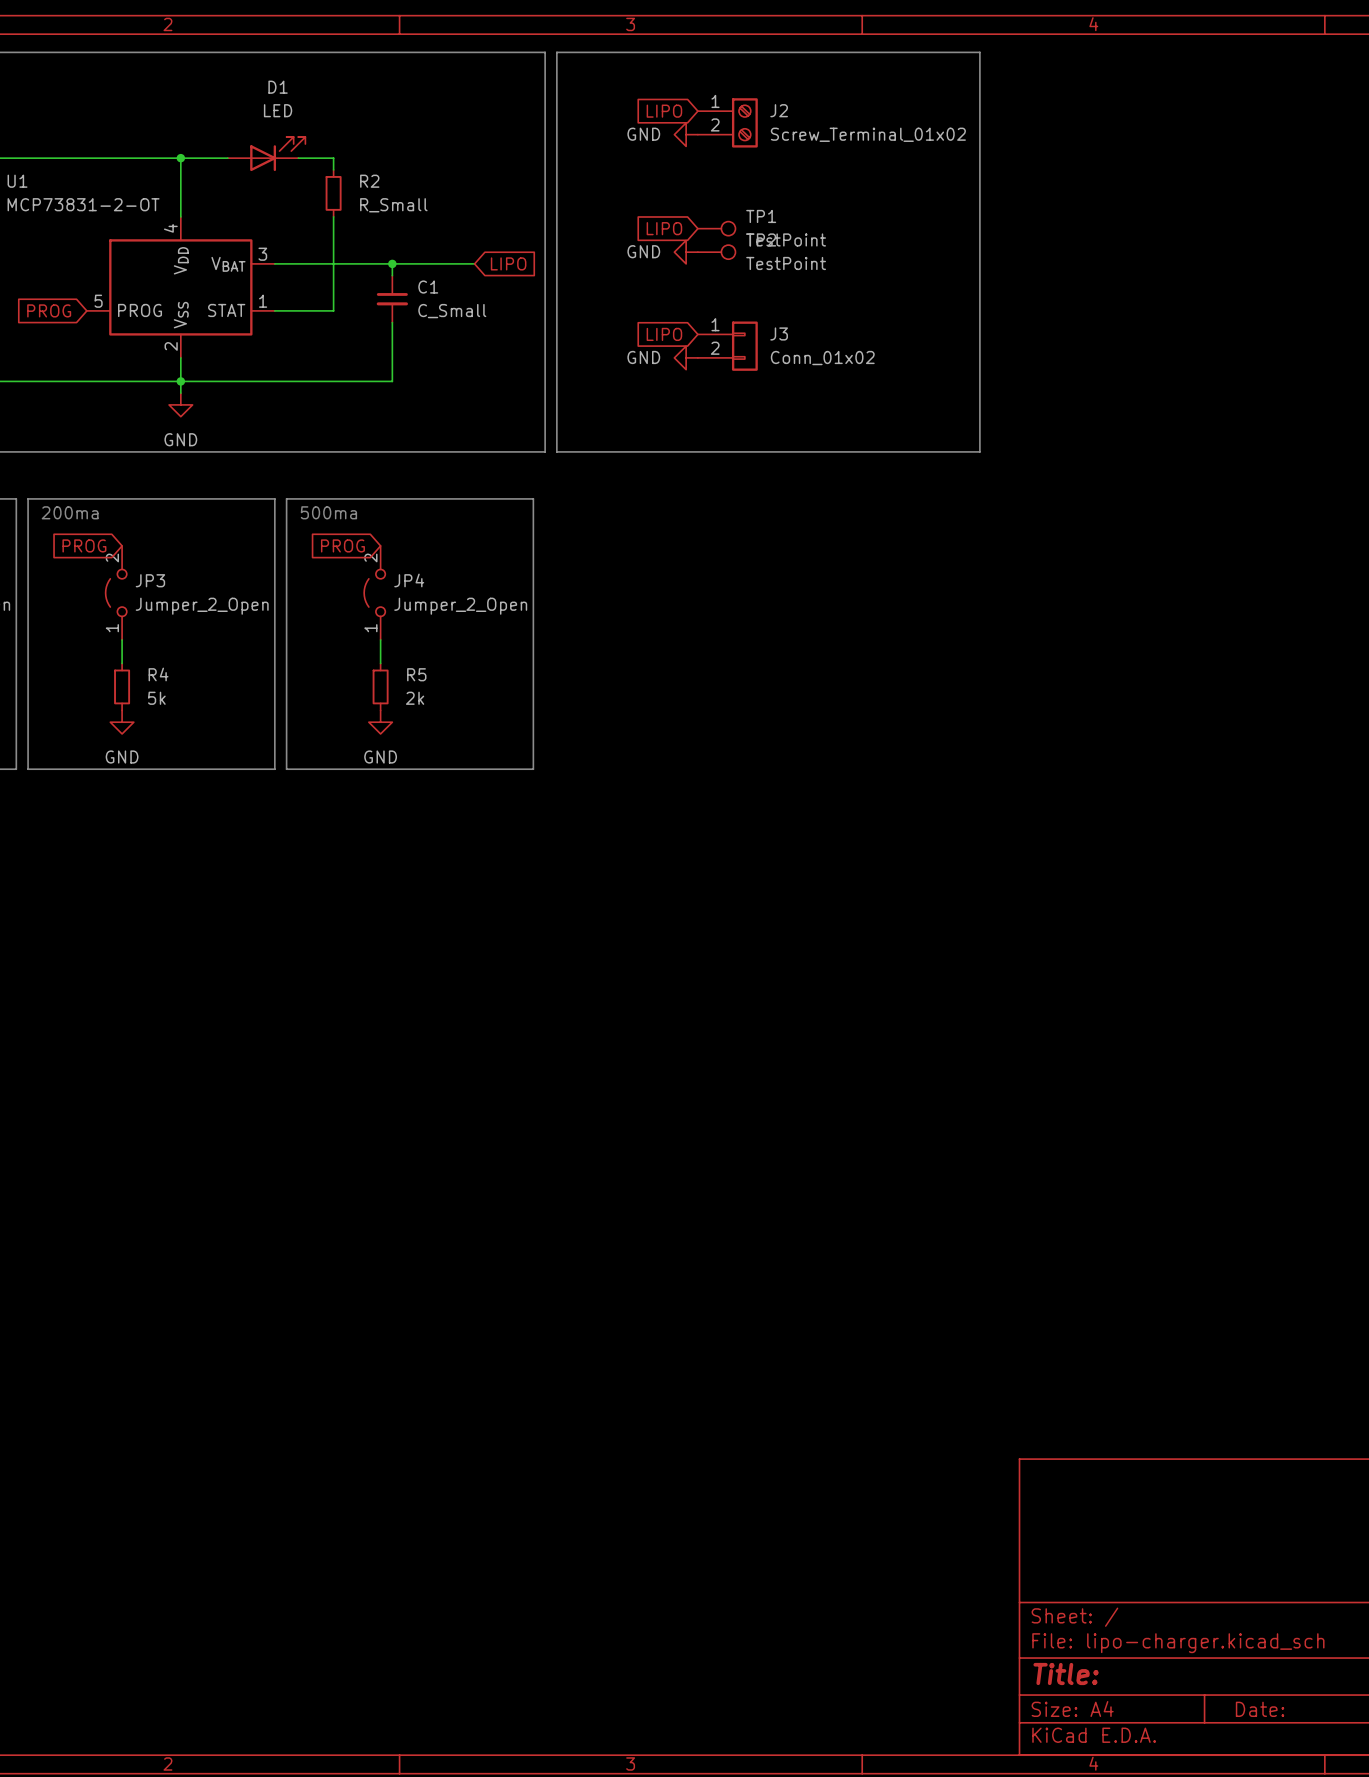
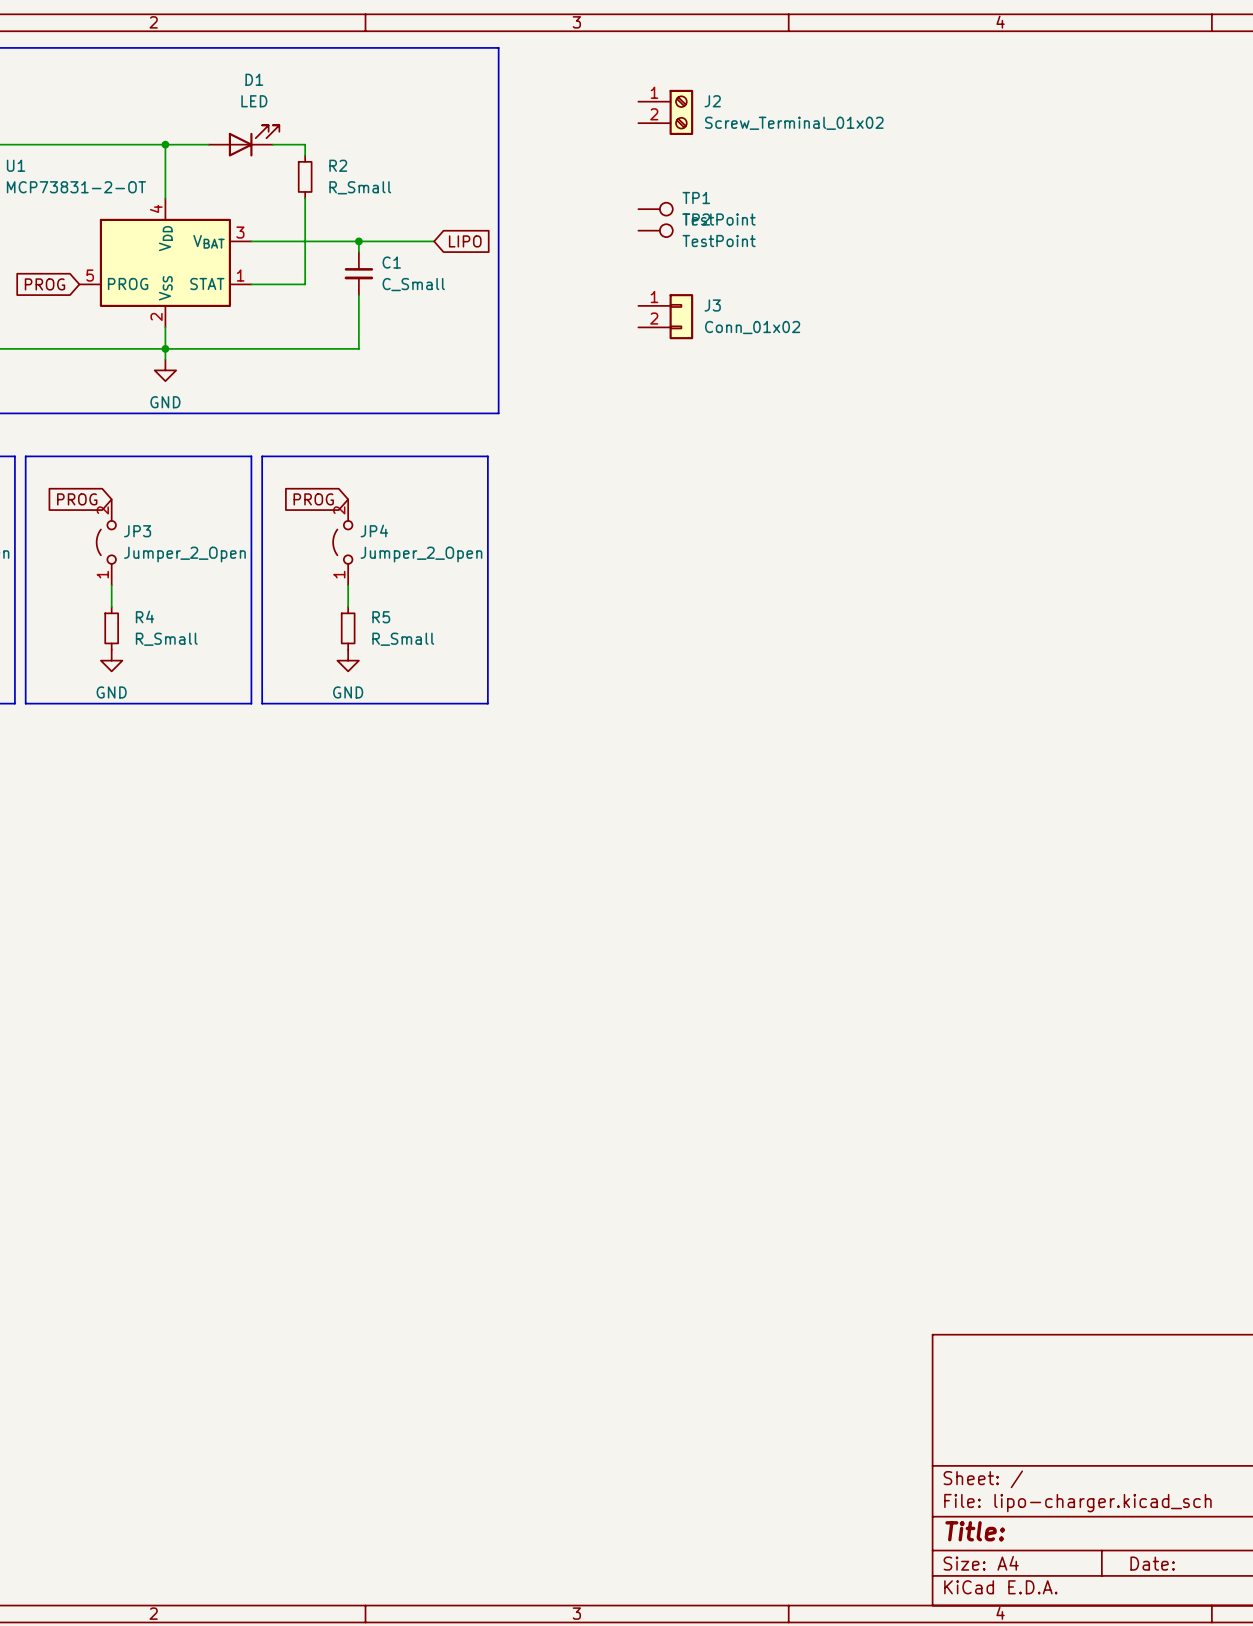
line: (556, 52) (556, 451) (979, 451) (979, 52) (556, 52) -> none
global label: LIPO (664, 111) -> none
power symbol: GND (686, 134) -> none
global label: LIPO (664, 228) -> none
power symbol: GND (686, 252) -> none
global label: LIPO (664, 334) -> none
power symbol: GND (686, 357) -> none
text: 200ma (70, 512) -> none
text: 500ma (328, 512) -> none
R4 value: 5k (156, 698) -> R_Small (166, 639)
R5 value: 2k (415, 698) -> R_Small (403, 639)

